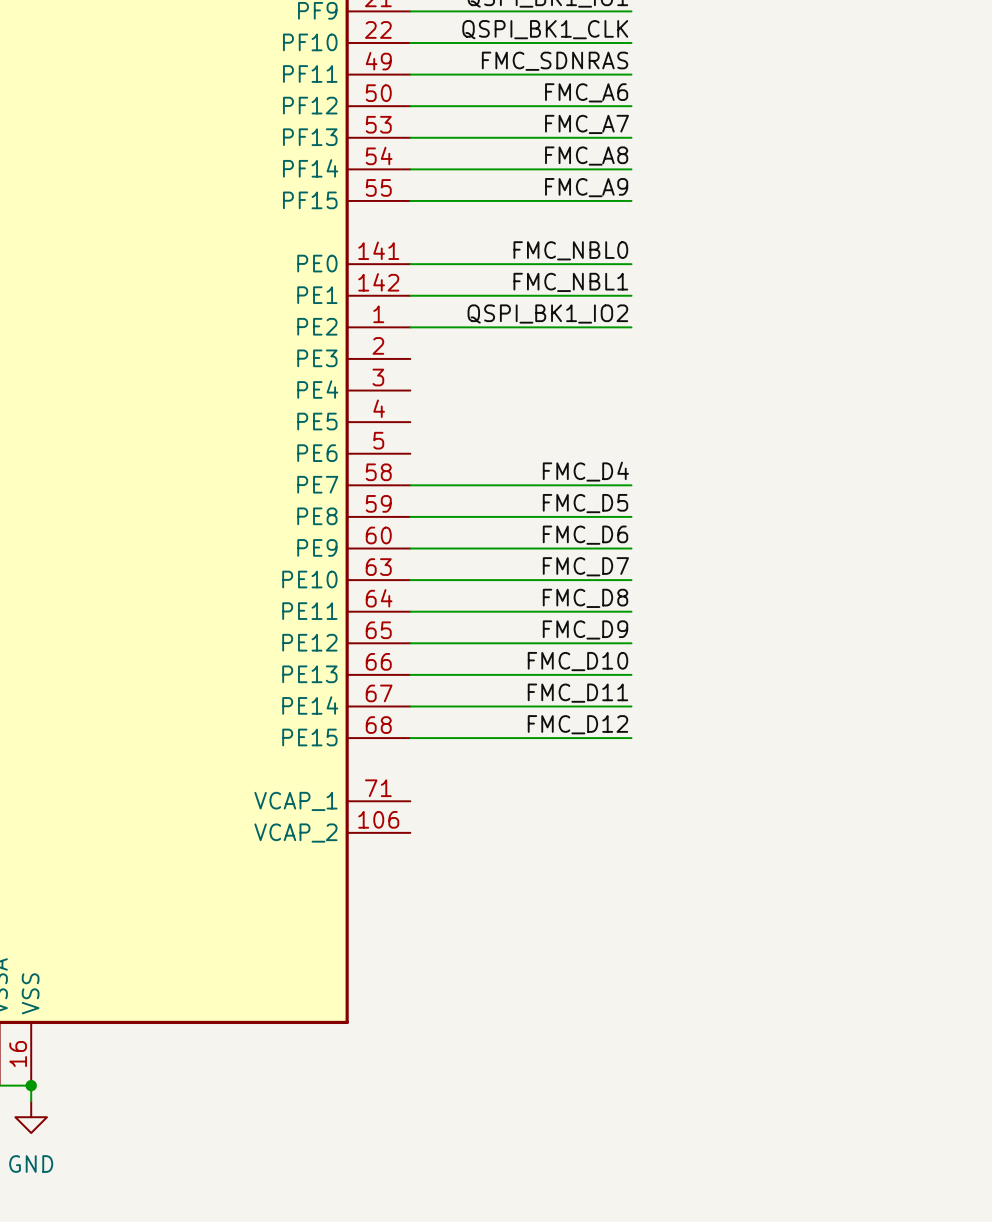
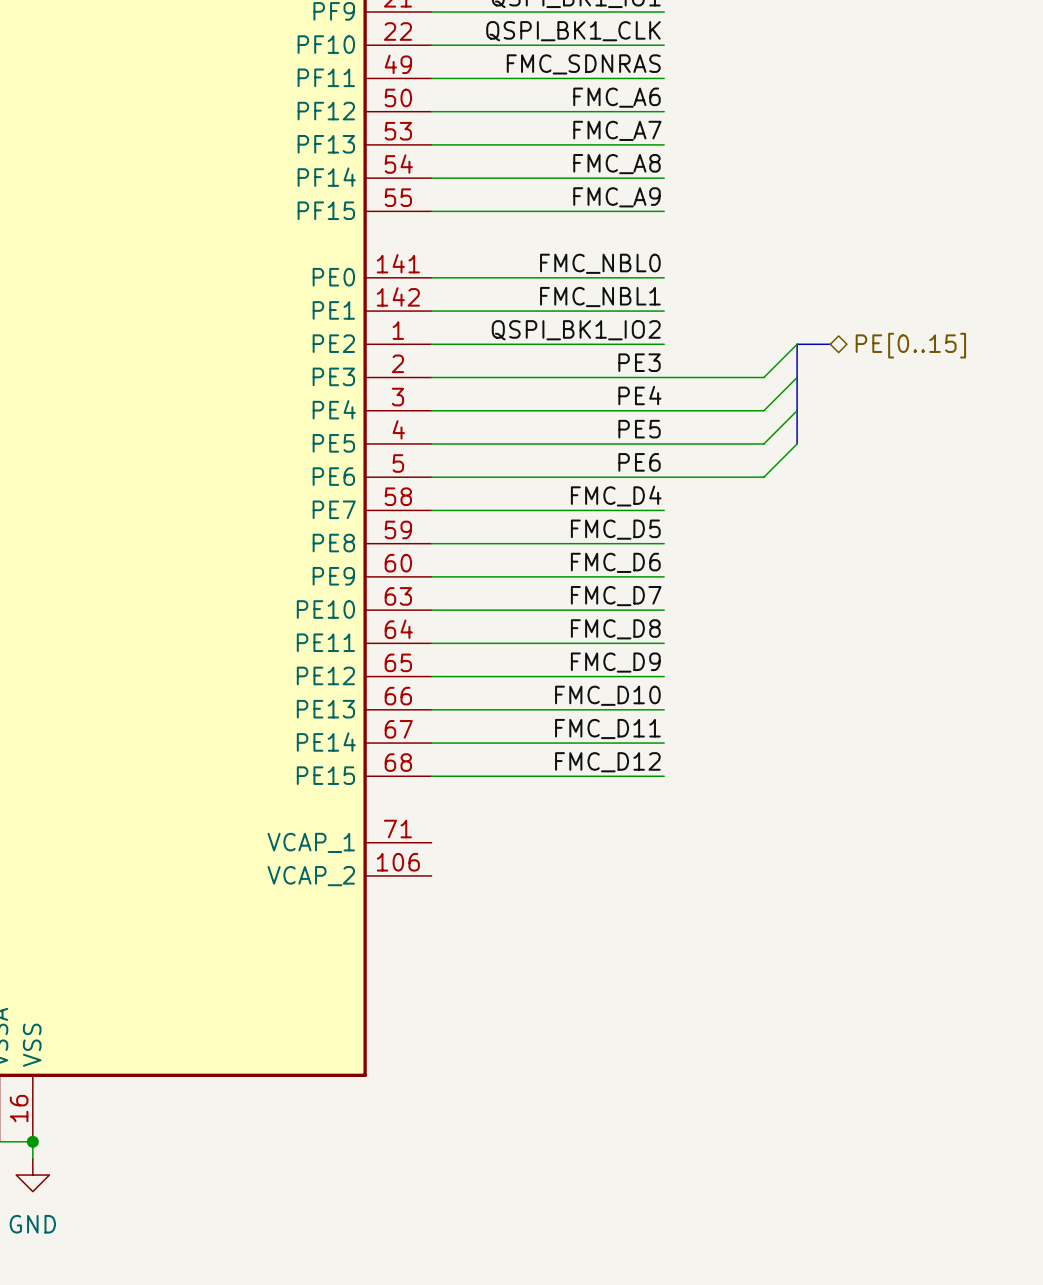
wire: none -> (797, 344) (763, 377) (431, 377)
bus: none -> (830, 344) (797, 344) (797, 443)
hierarchical label: none -> PE[0..15] (910, 345)
label: none -> PE3 (639, 362)
wire: none -> (797, 377) (763, 410) (431, 410)
label: none -> PE4 (639, 395)
wire: none -> (797, 410) (763, 443) (431, 443)
label: none -> PE5 (639, 429)
wire: none -> (797, 443) (763, 477) (431, 477)
label: none -> PE6 (639, 462)

